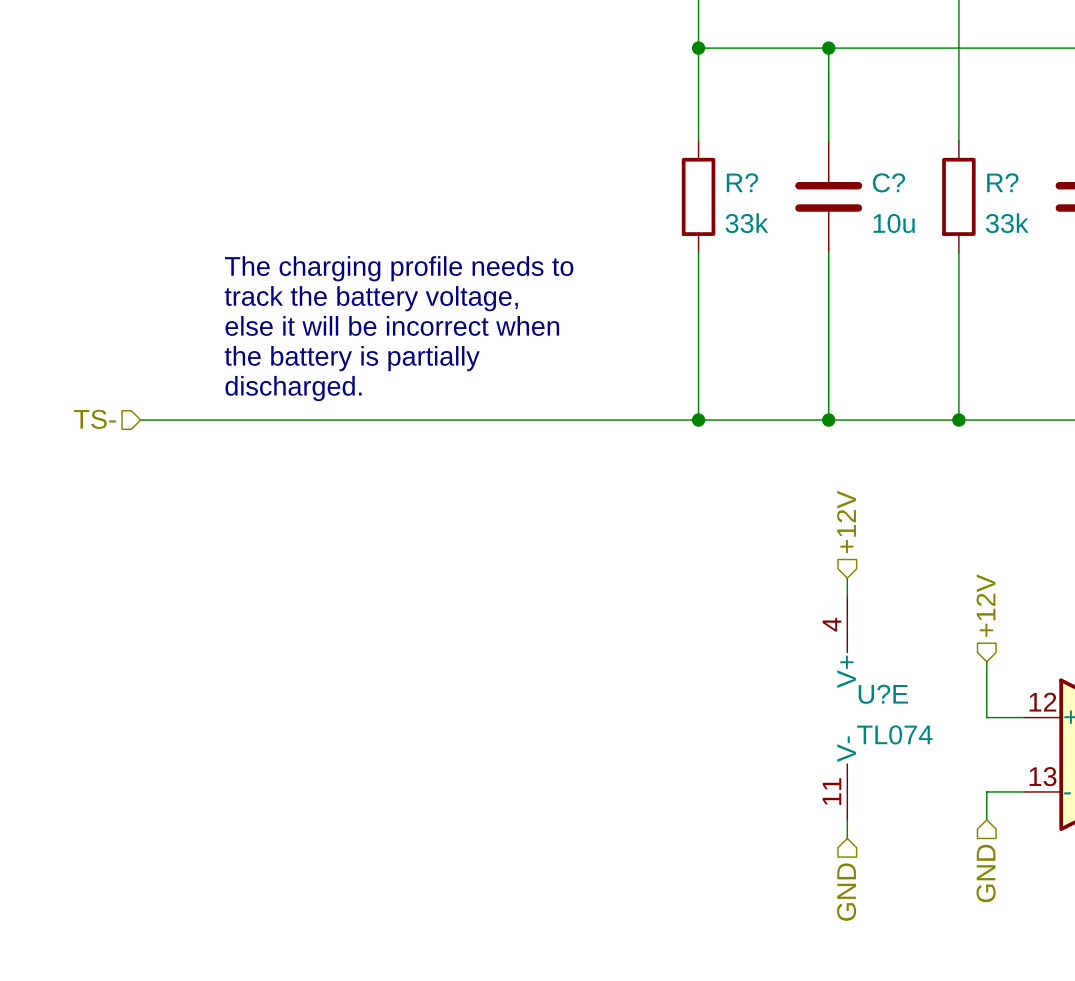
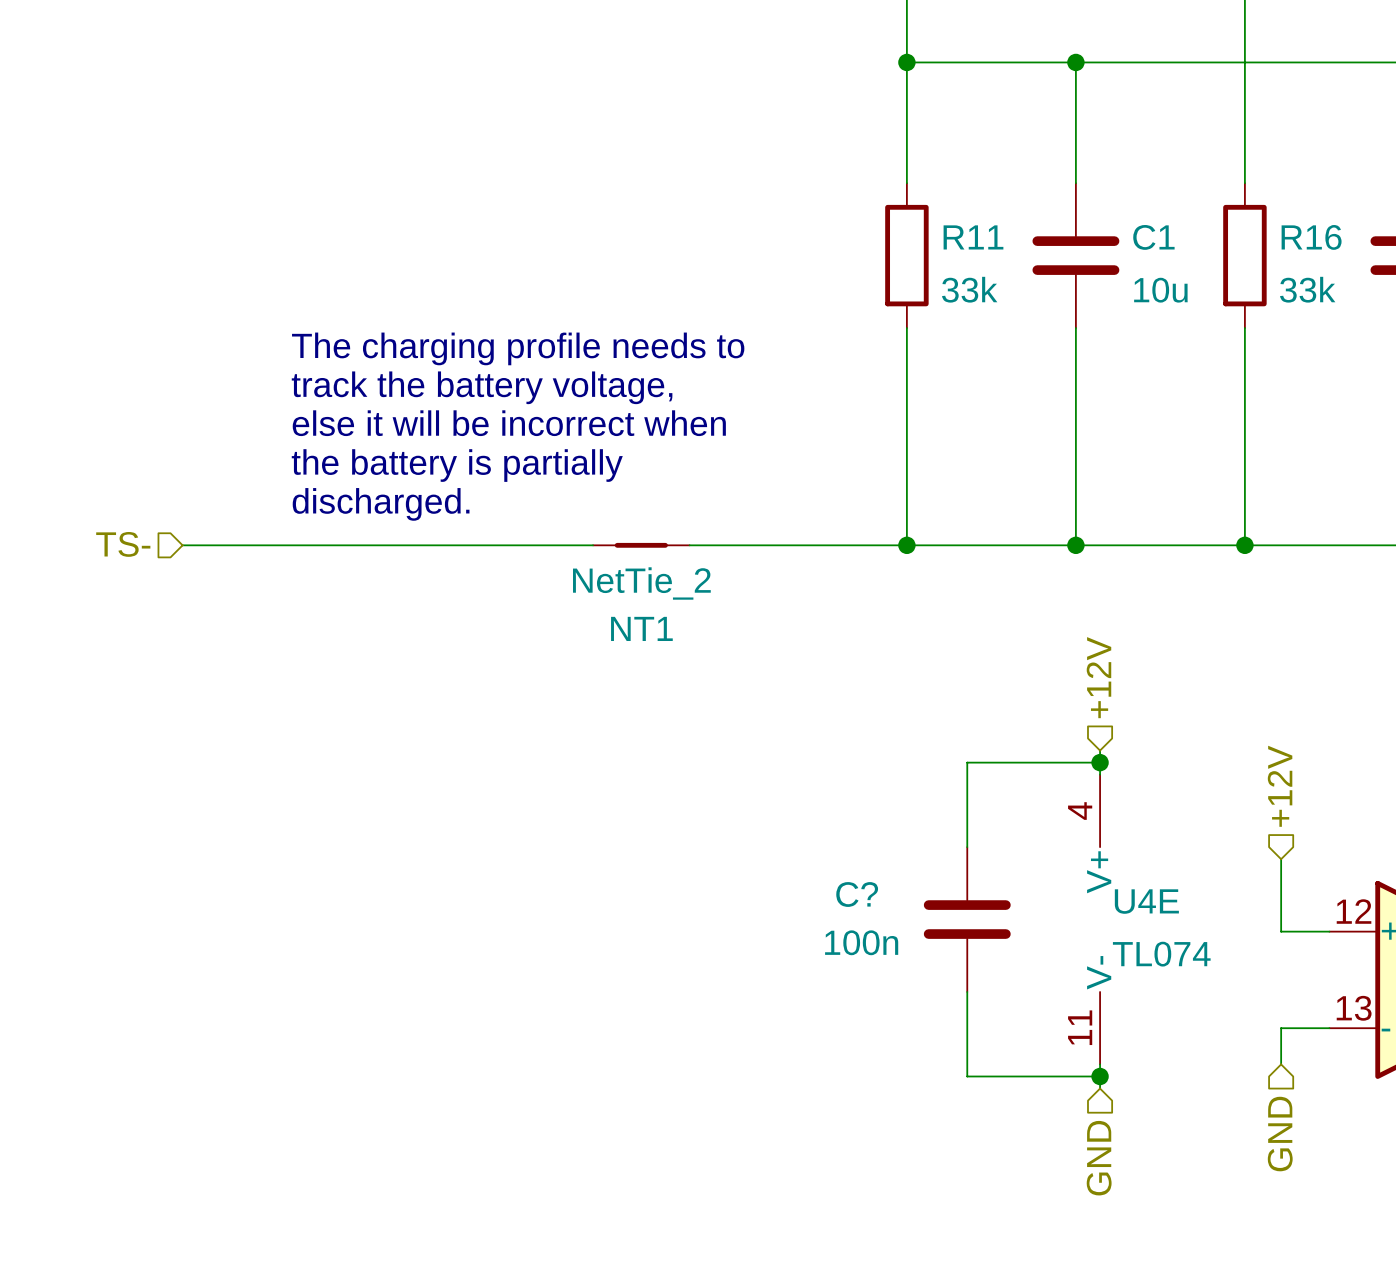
R? name: R? (742, 182) -> R11 (973, 237)
C? name: C? (888, 182) -> C1 (1153, 237)
R? name: R? (1002, 182) -> R16 (1311, 237)
NT1: none -> NetTie_2 (641, 545)
wire: none -> (1100, 762) (967, 762) (967, 847)
junction: none -> (1100, 762)
U?E name: U?E (883, 694) -> U4E (1146, 901)
C?: none -> 100n (967, 919)
wire: none -> (967, 991) (967, 1076) (1100, 1076)
junction: none -> (1100, 1076)

